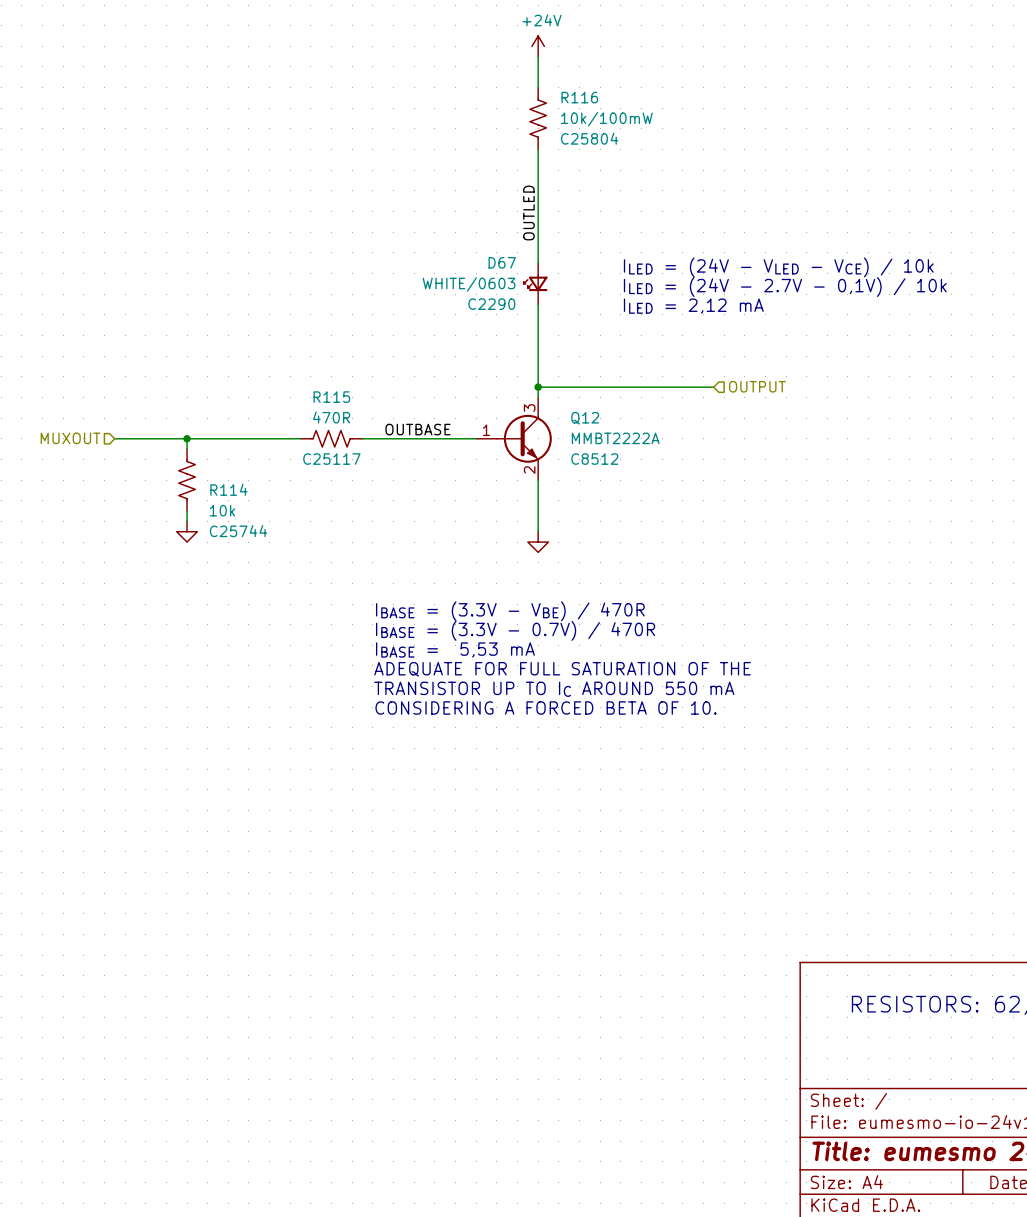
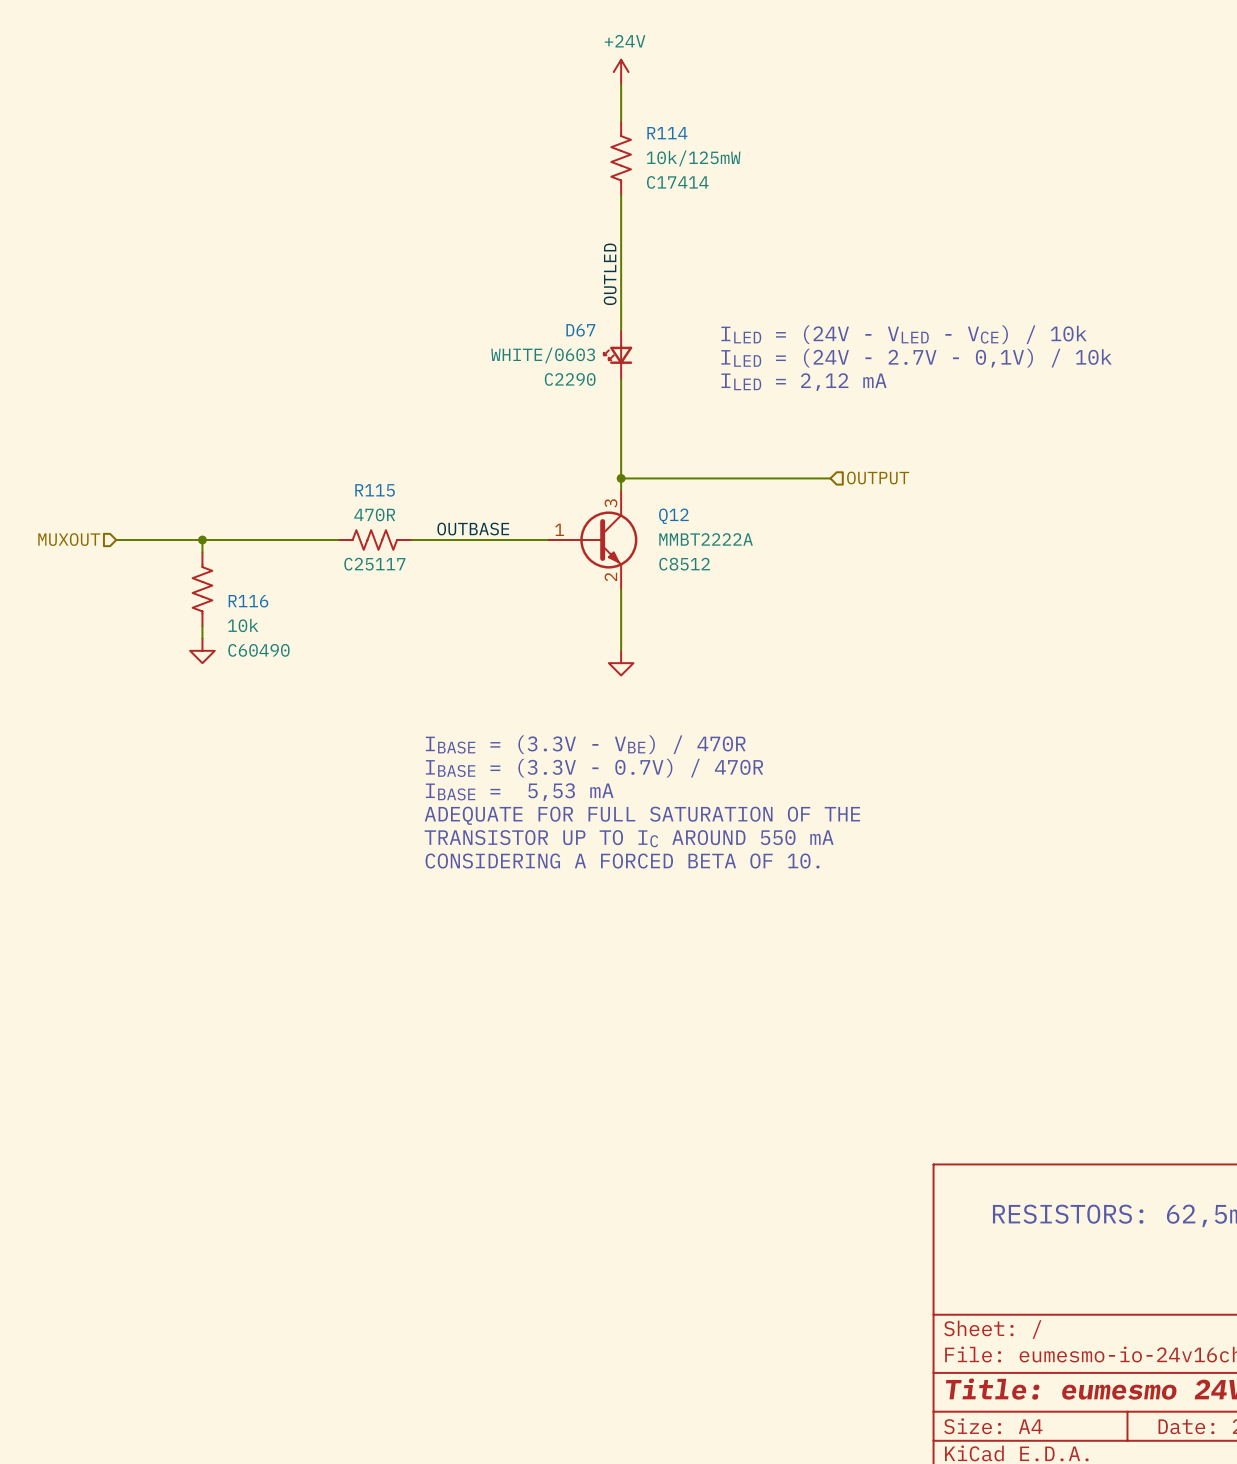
R116 name: R116 (579, 97) -> R114 (667, 133)
R116 value: 10k/100mW (606, 119) -> 10k/125mW (693, 158)
R116 text: C25804 (589, 138) -> C17414 (677, 182)
R114 name: R114 (228, 489) -> R116 (248, 601)
R114 text: C25744 (238, 531) -> C60490 (258, 650)

